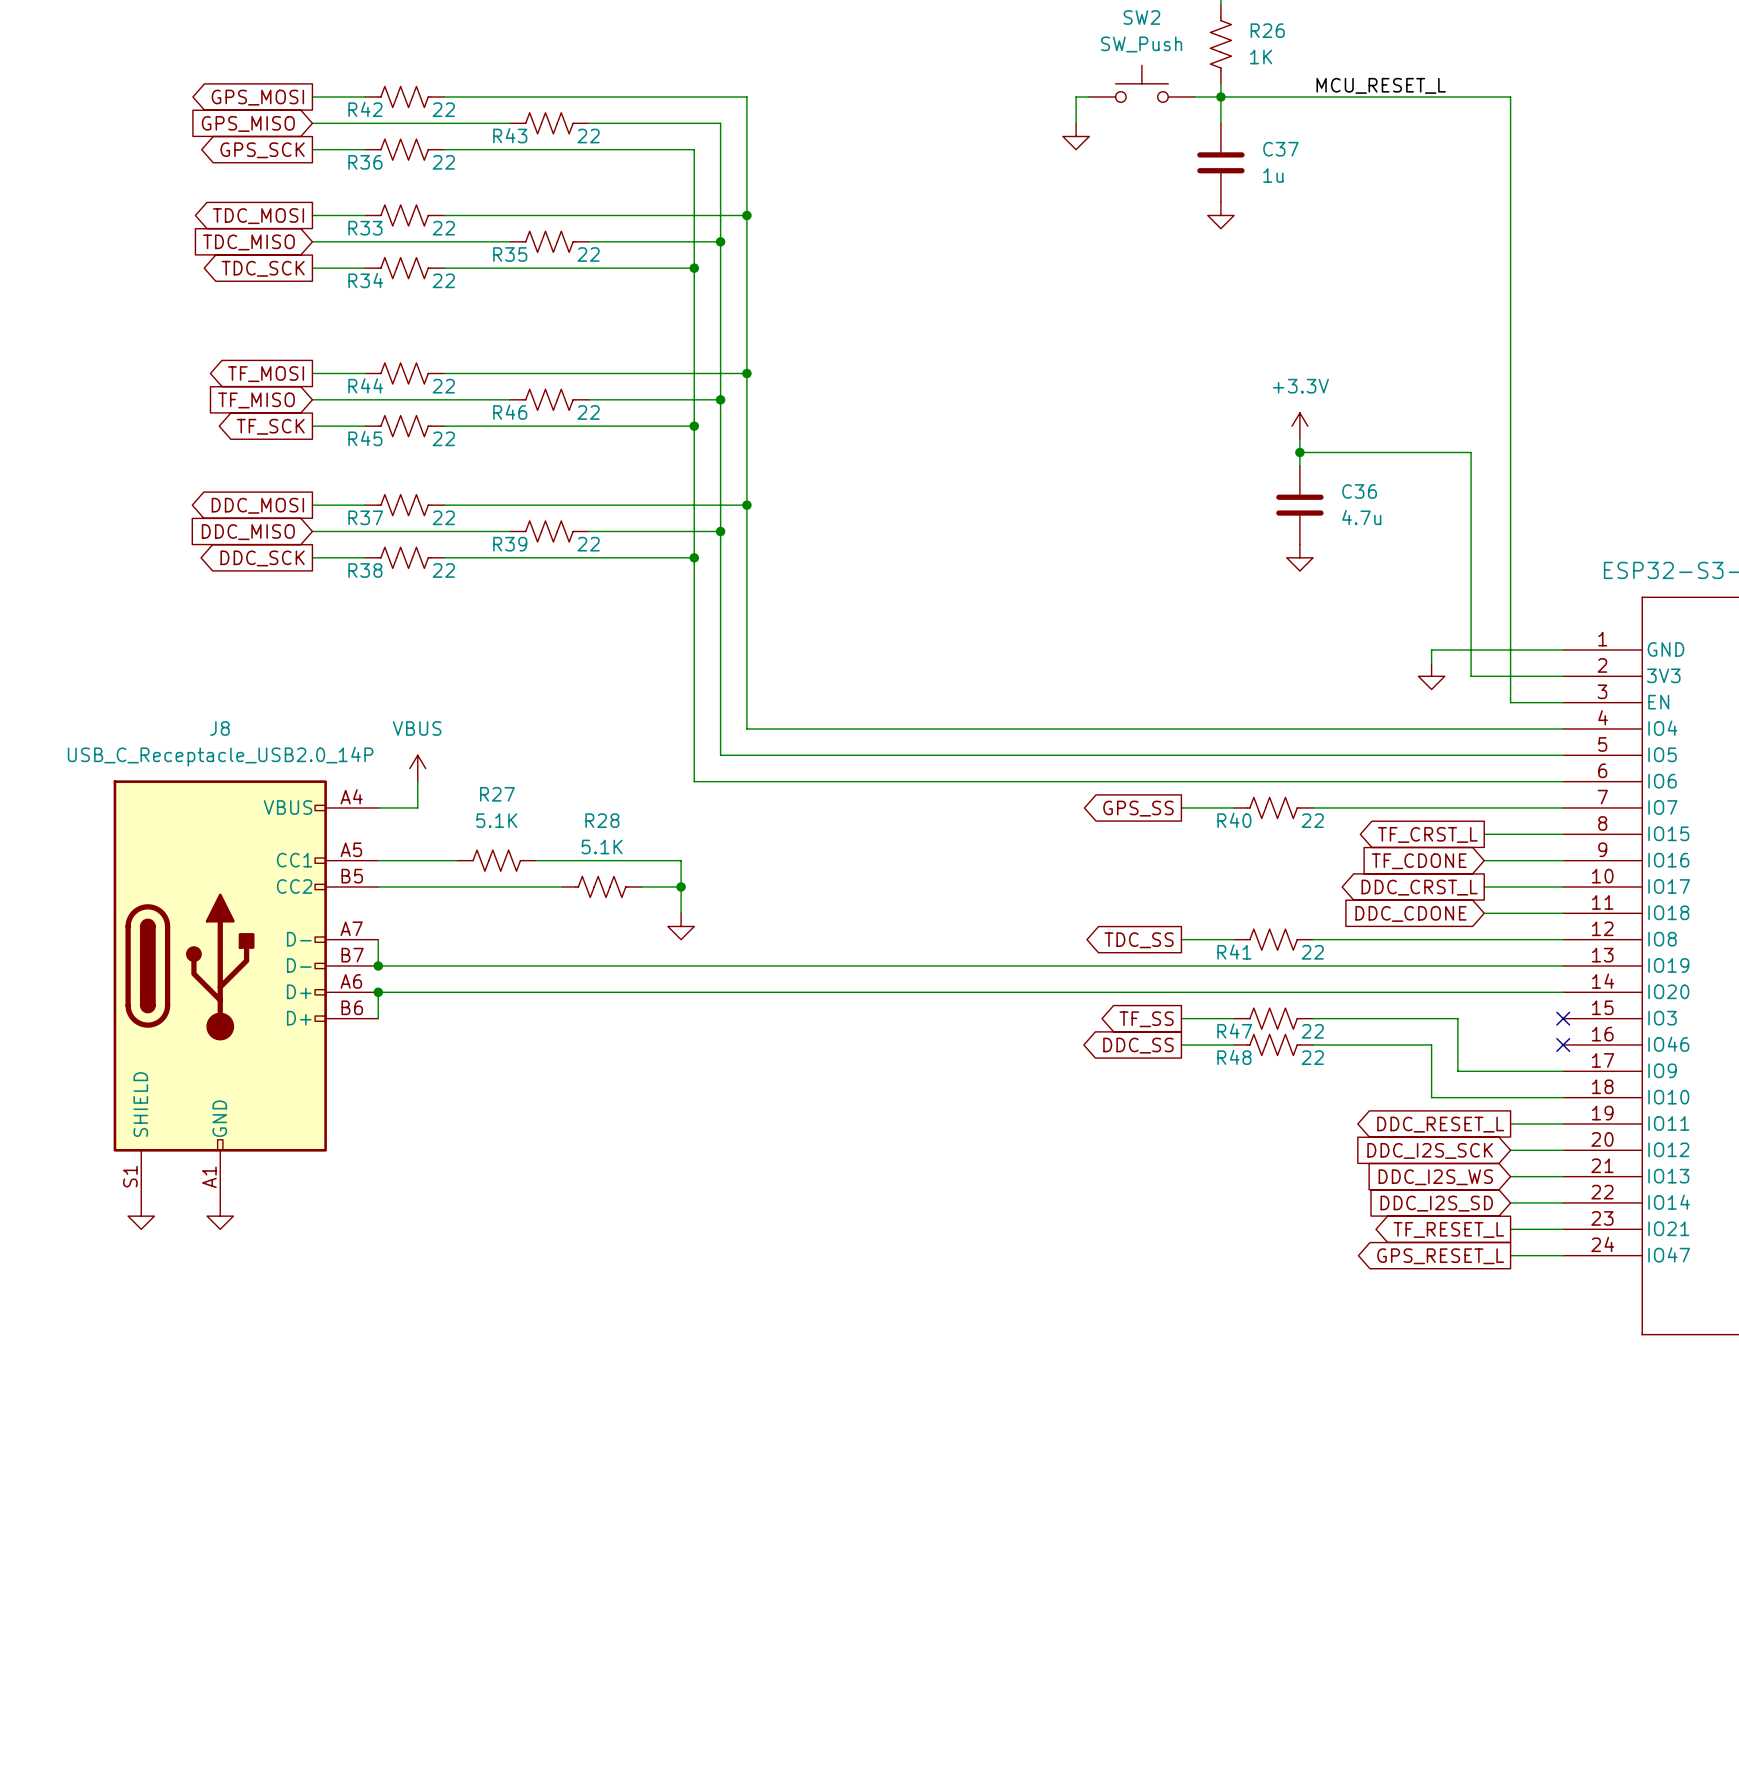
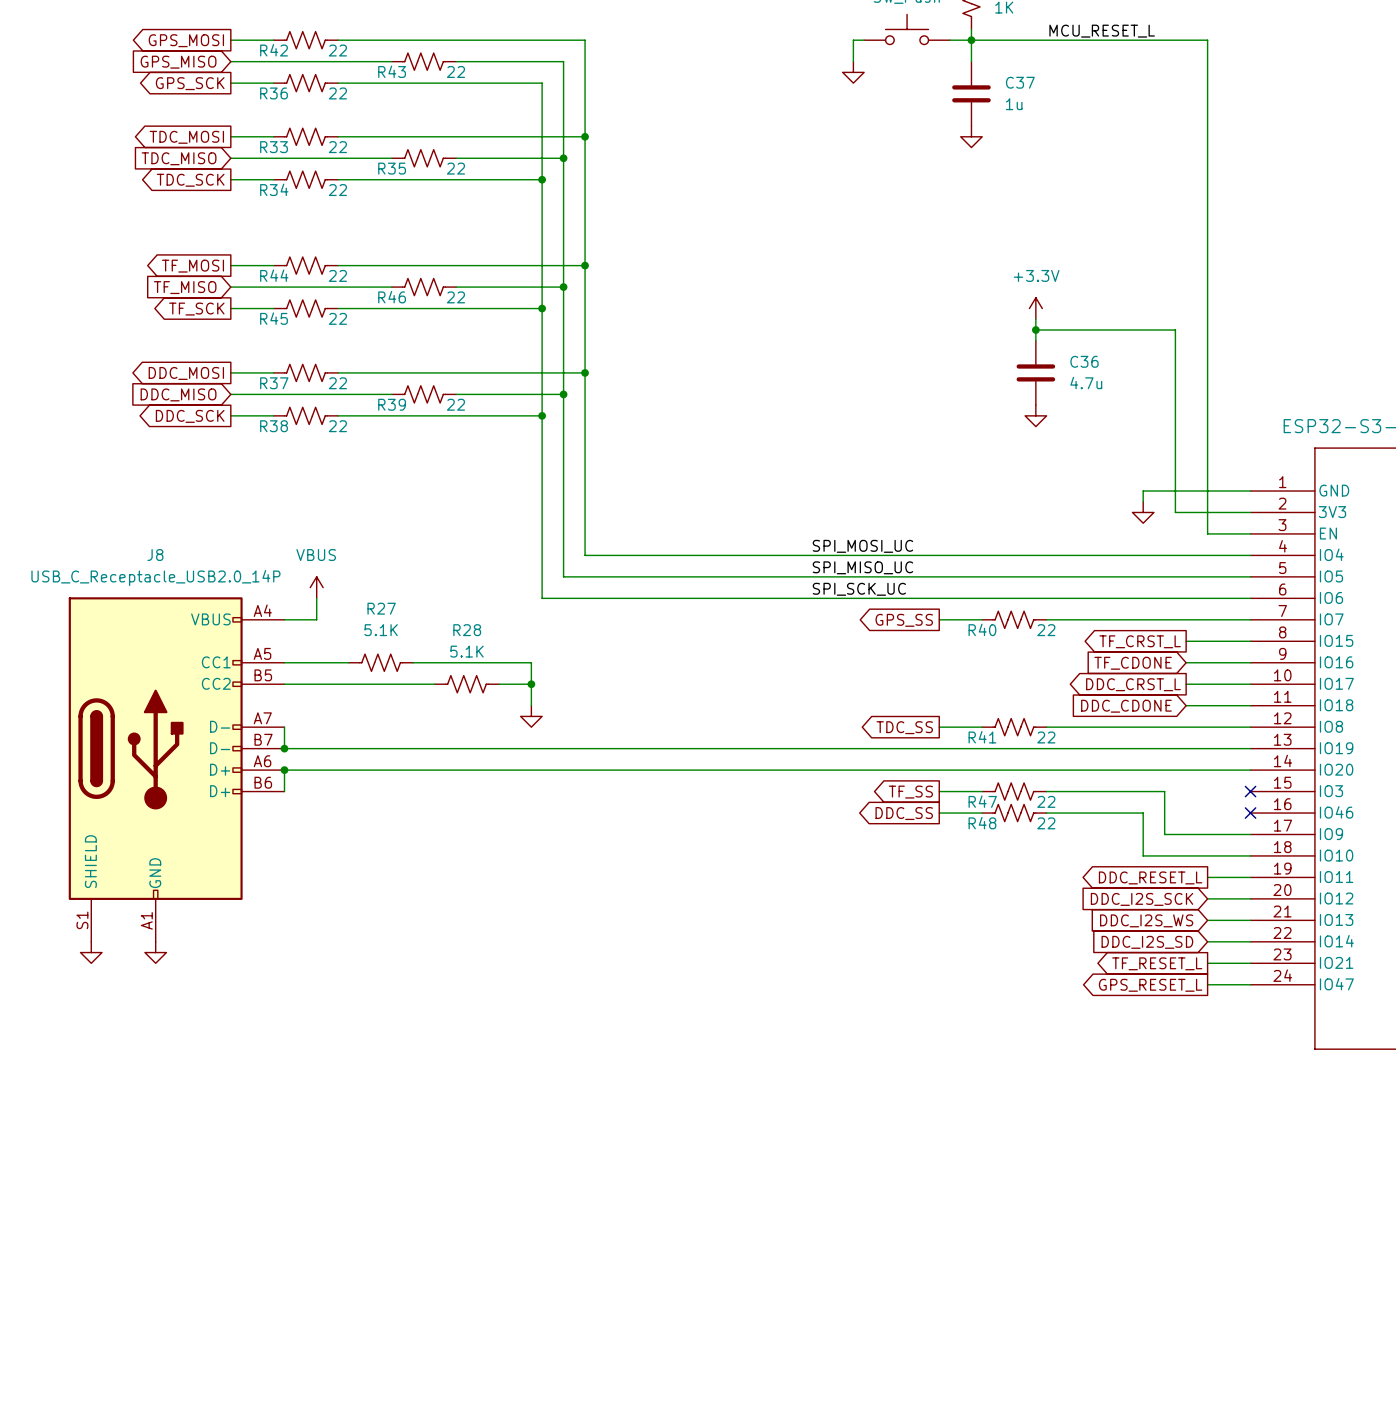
label: none -> SPI_MOSI_UC (862, 546)
label: none -> SPI_MISO_UC (862, 567)
label: none -> SPI_SCK_UC (859, 589)

